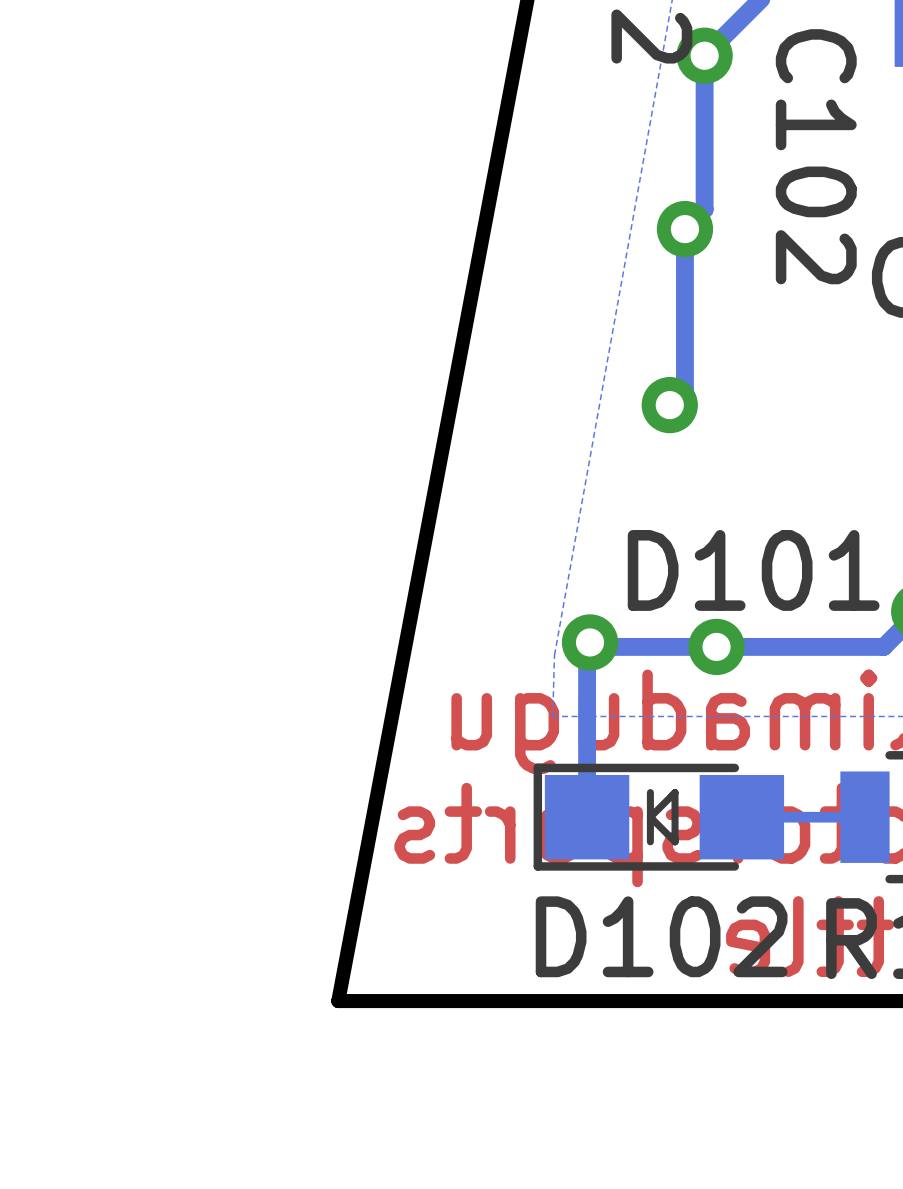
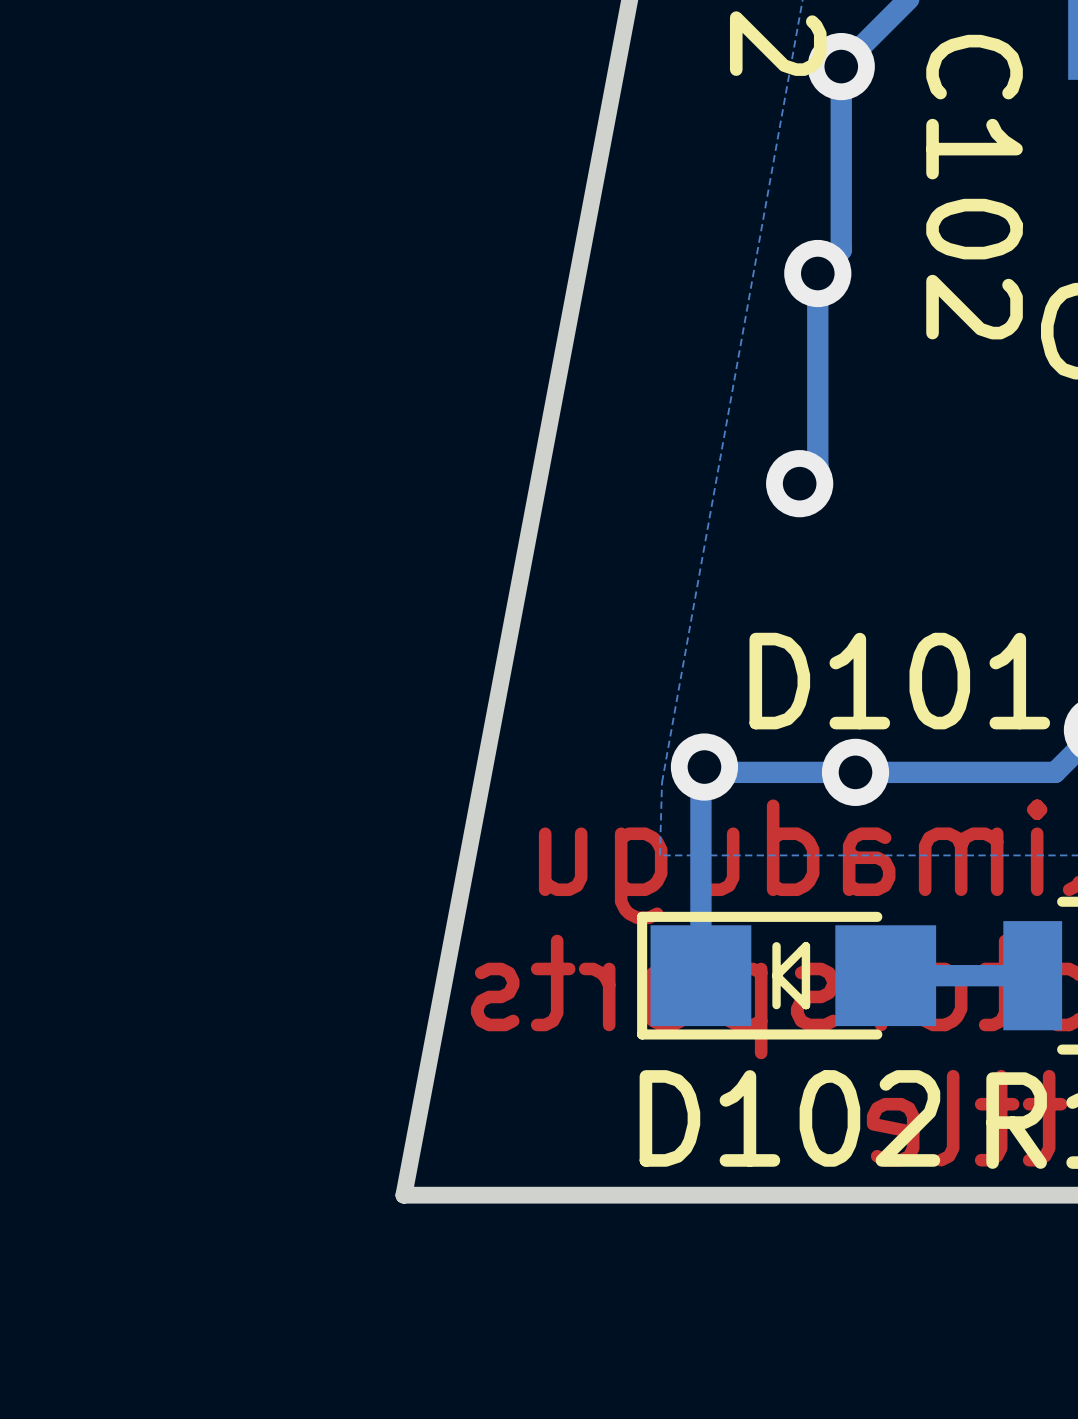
bottom track width: thin (864, 817) (741, 817) -> thick (1032, 975) (885, 975)

